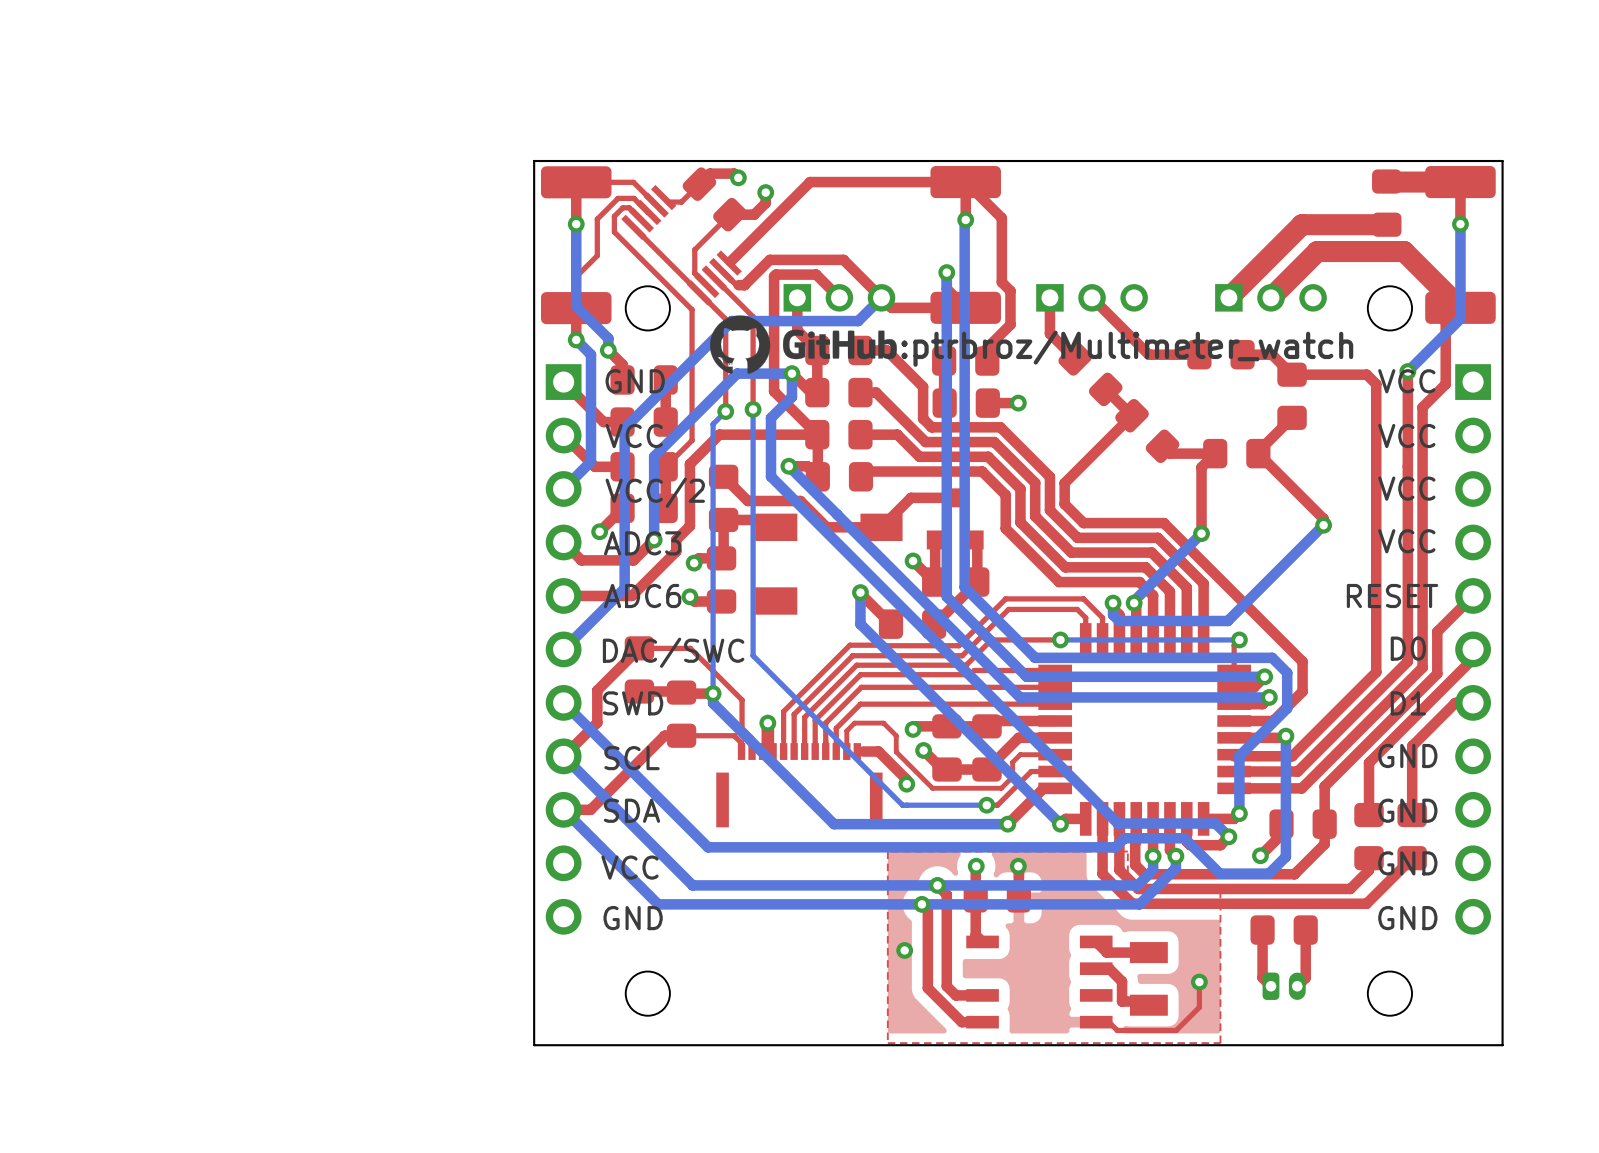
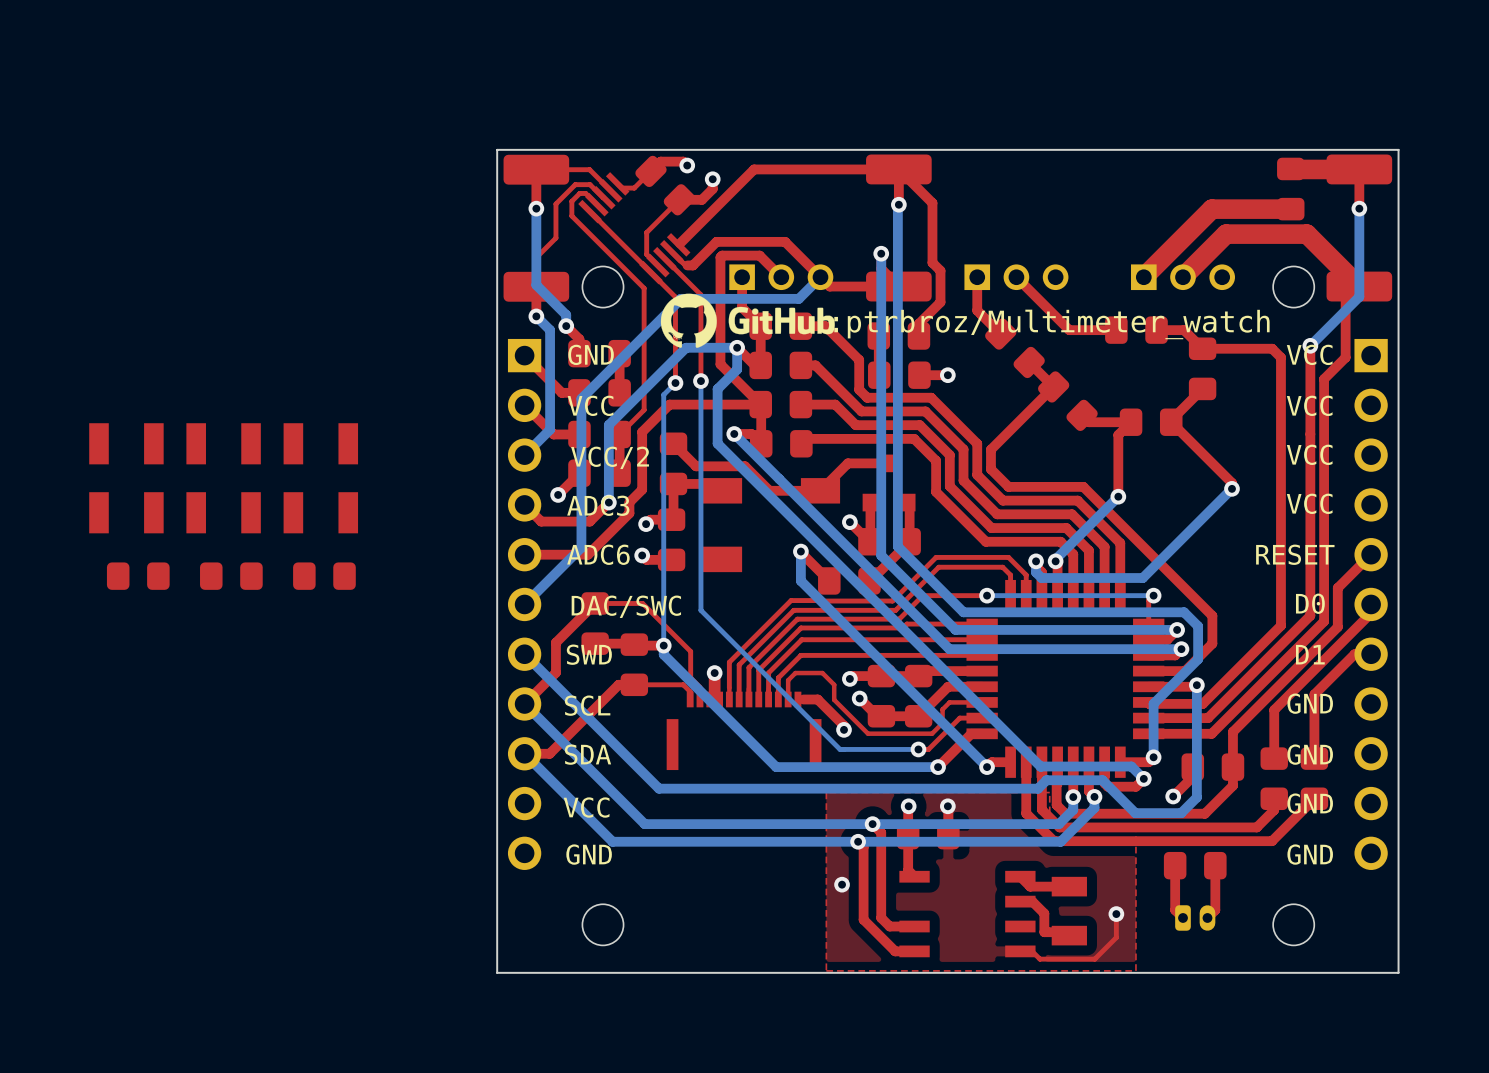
part: none -> (126, 443)
part: none -> (223, 443)
part: none -> (320, 443)
part: none -> (126, 512)
part: none -> (223, 512)
part: none -> (320, 512)
part: none -> (138, 576)
part: none -> (231, 576)
part: none -> (324, 576)

